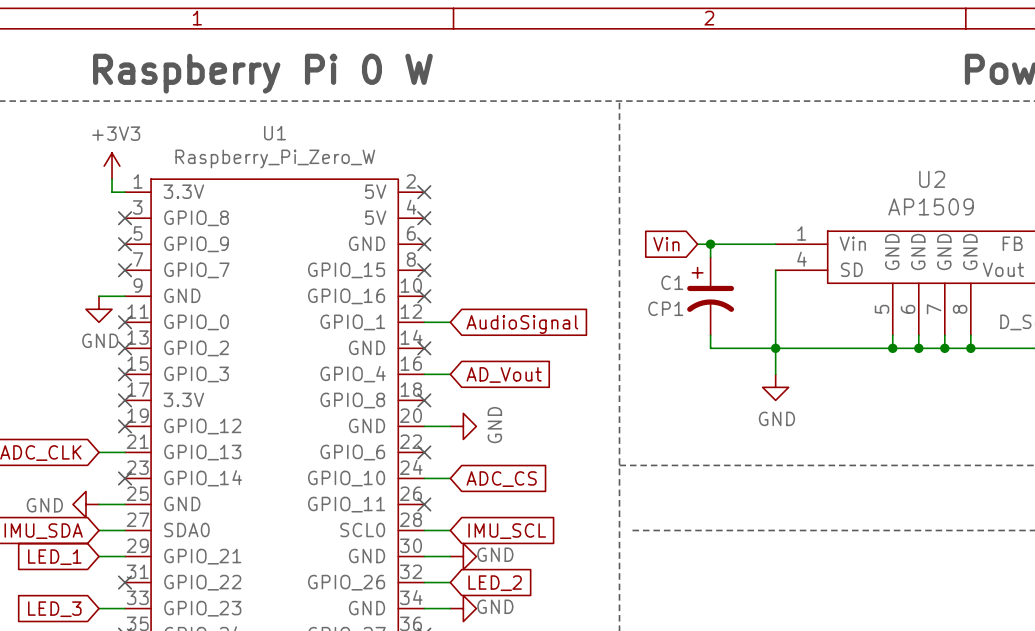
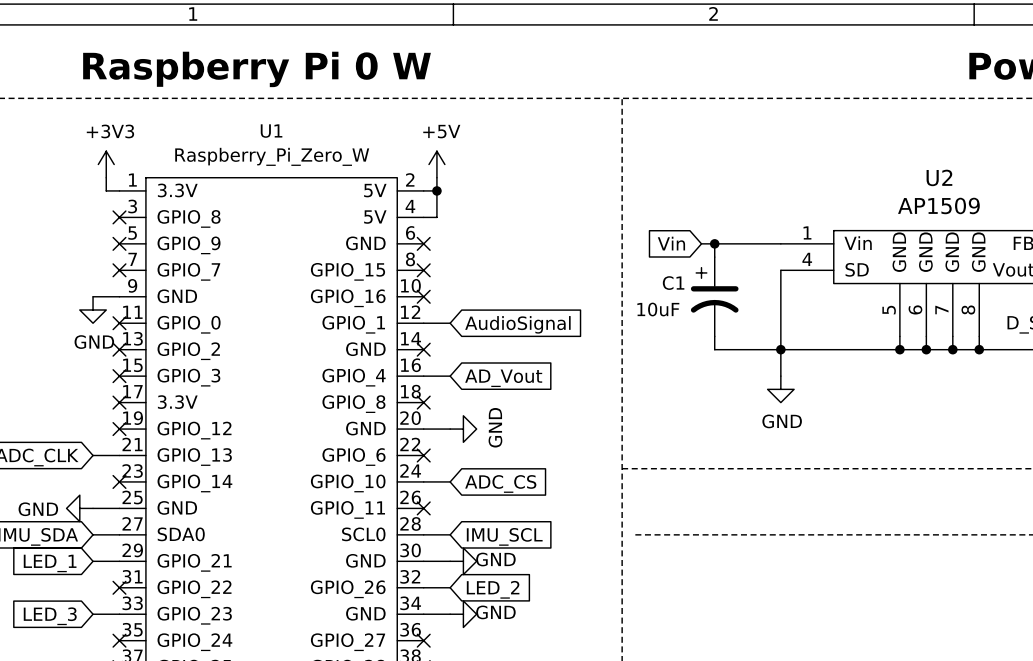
power symbol: none -> +5V (436, 164)
wire: none -> (436, 177) (436, 217) (423, 217)
wire: none -> (423, 190) (436, 190)
no-connect mark: (424, 192) -> none
junction: none -> (436, 190)
no-connect mark: (424, 218) -> none
C1 value: CP1 (665, 308) -> 10uF (658, 309)

